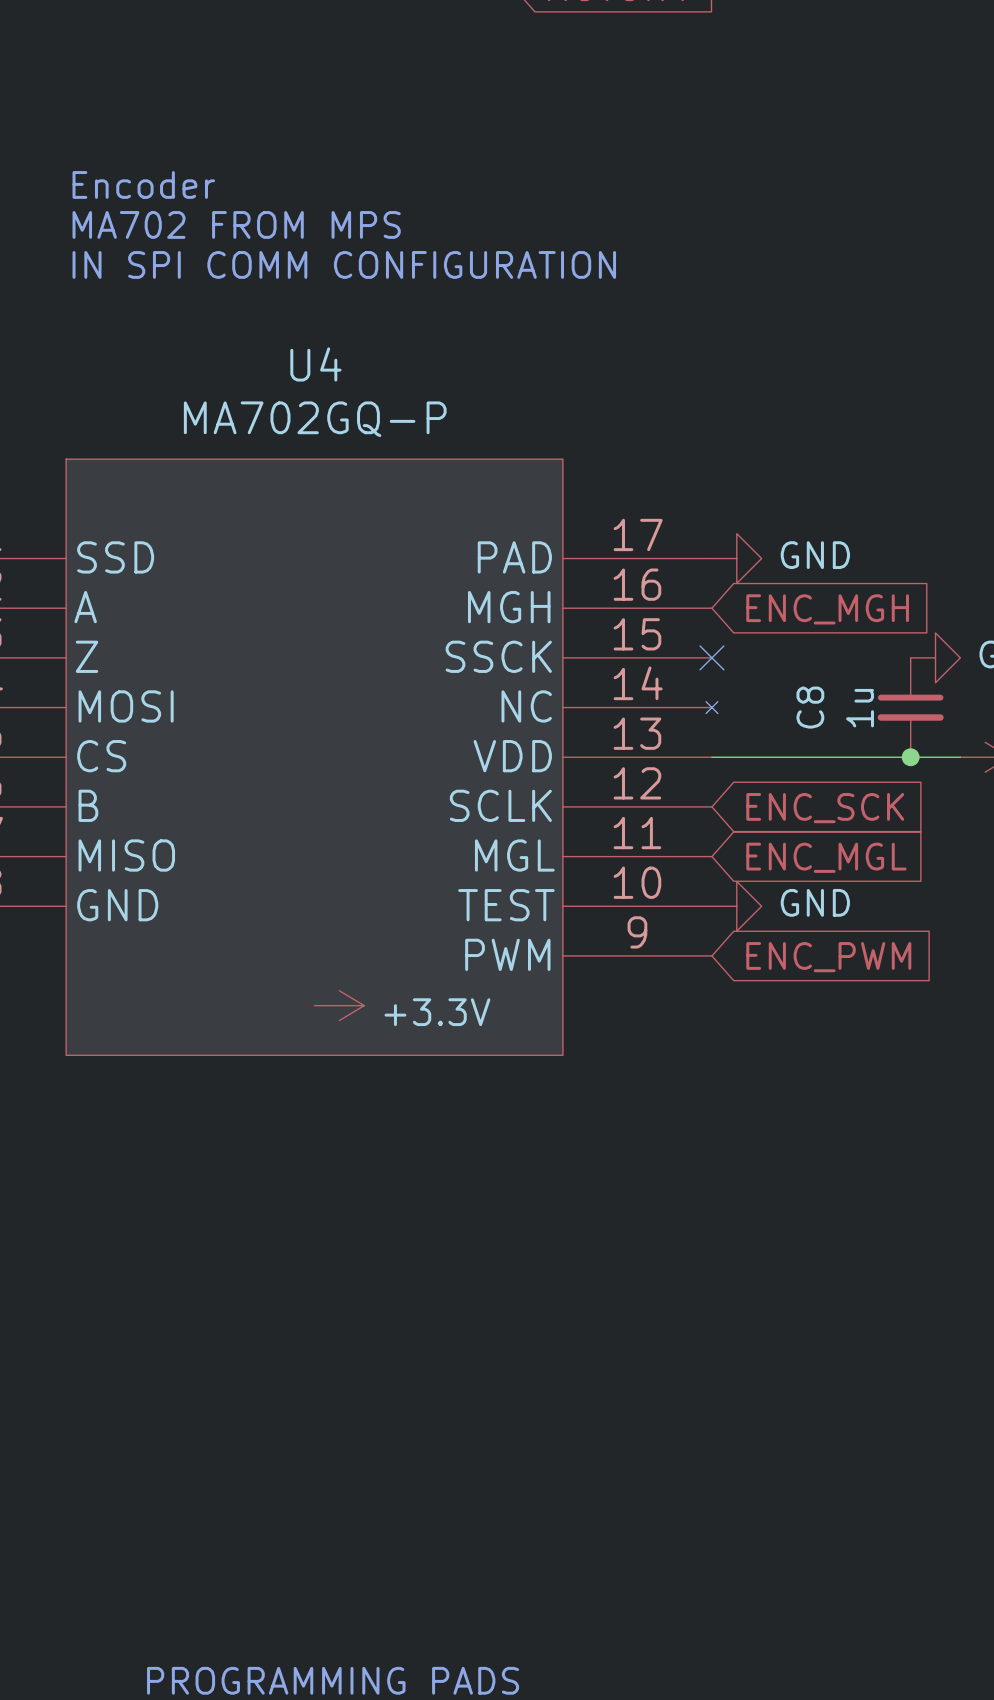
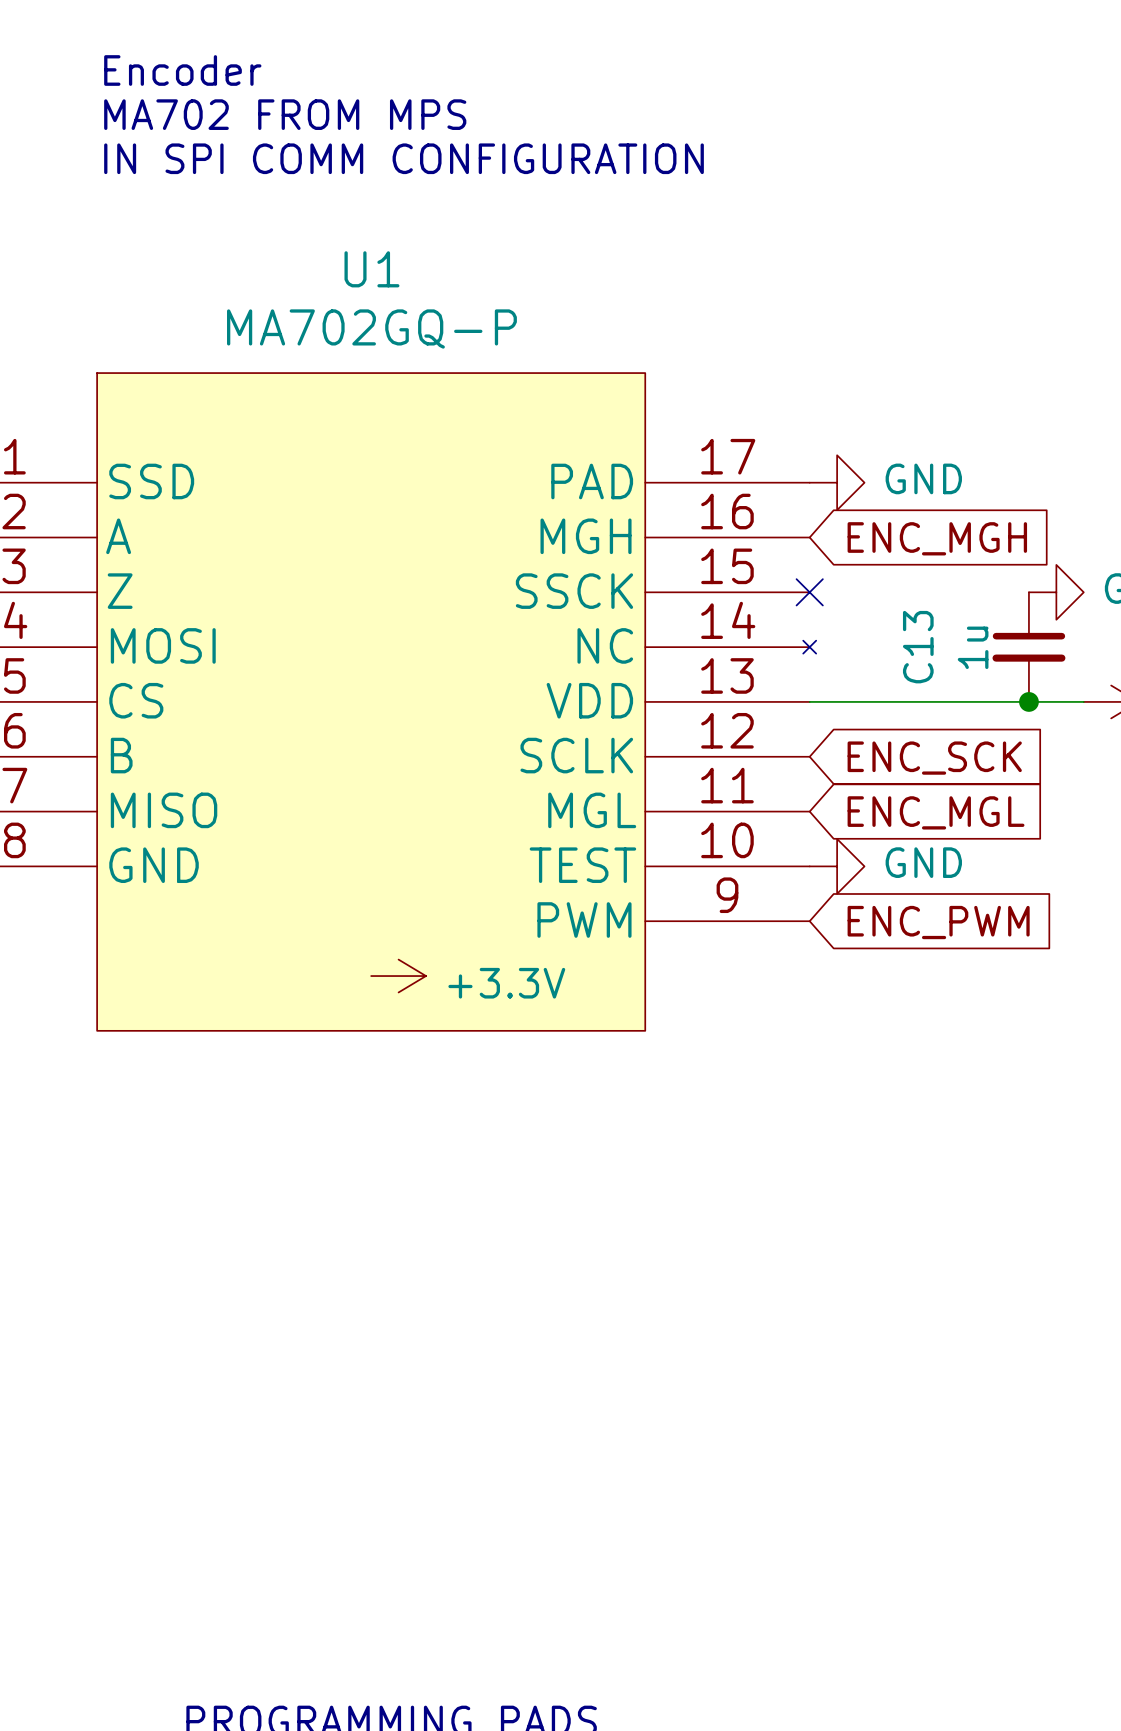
U4 name: U4 (315, 364) -> U1 (371, 269)
C8 name: C8 (810, 707) -> C13 (918, 647)

